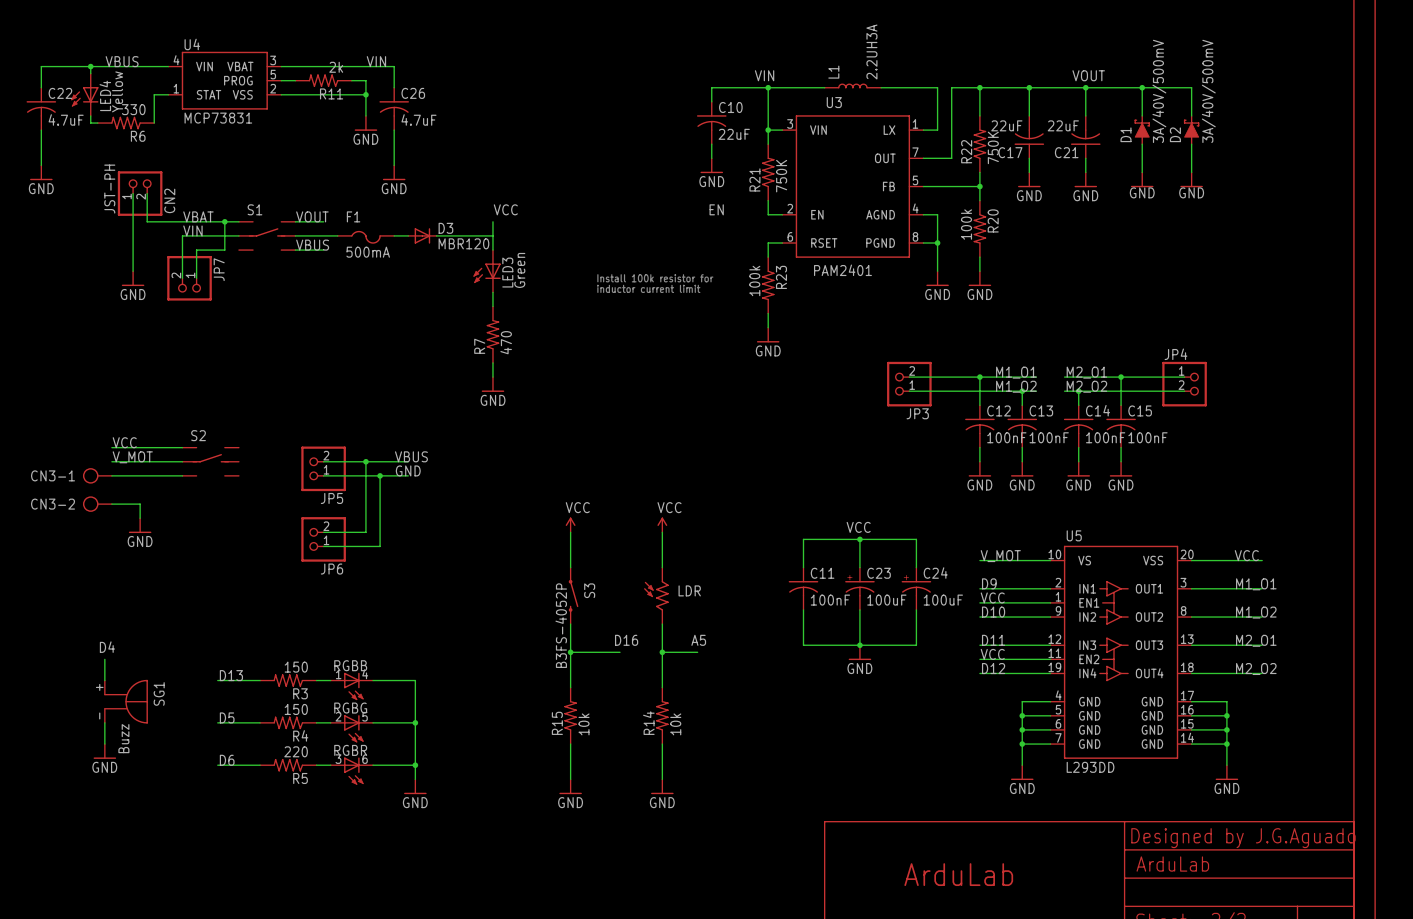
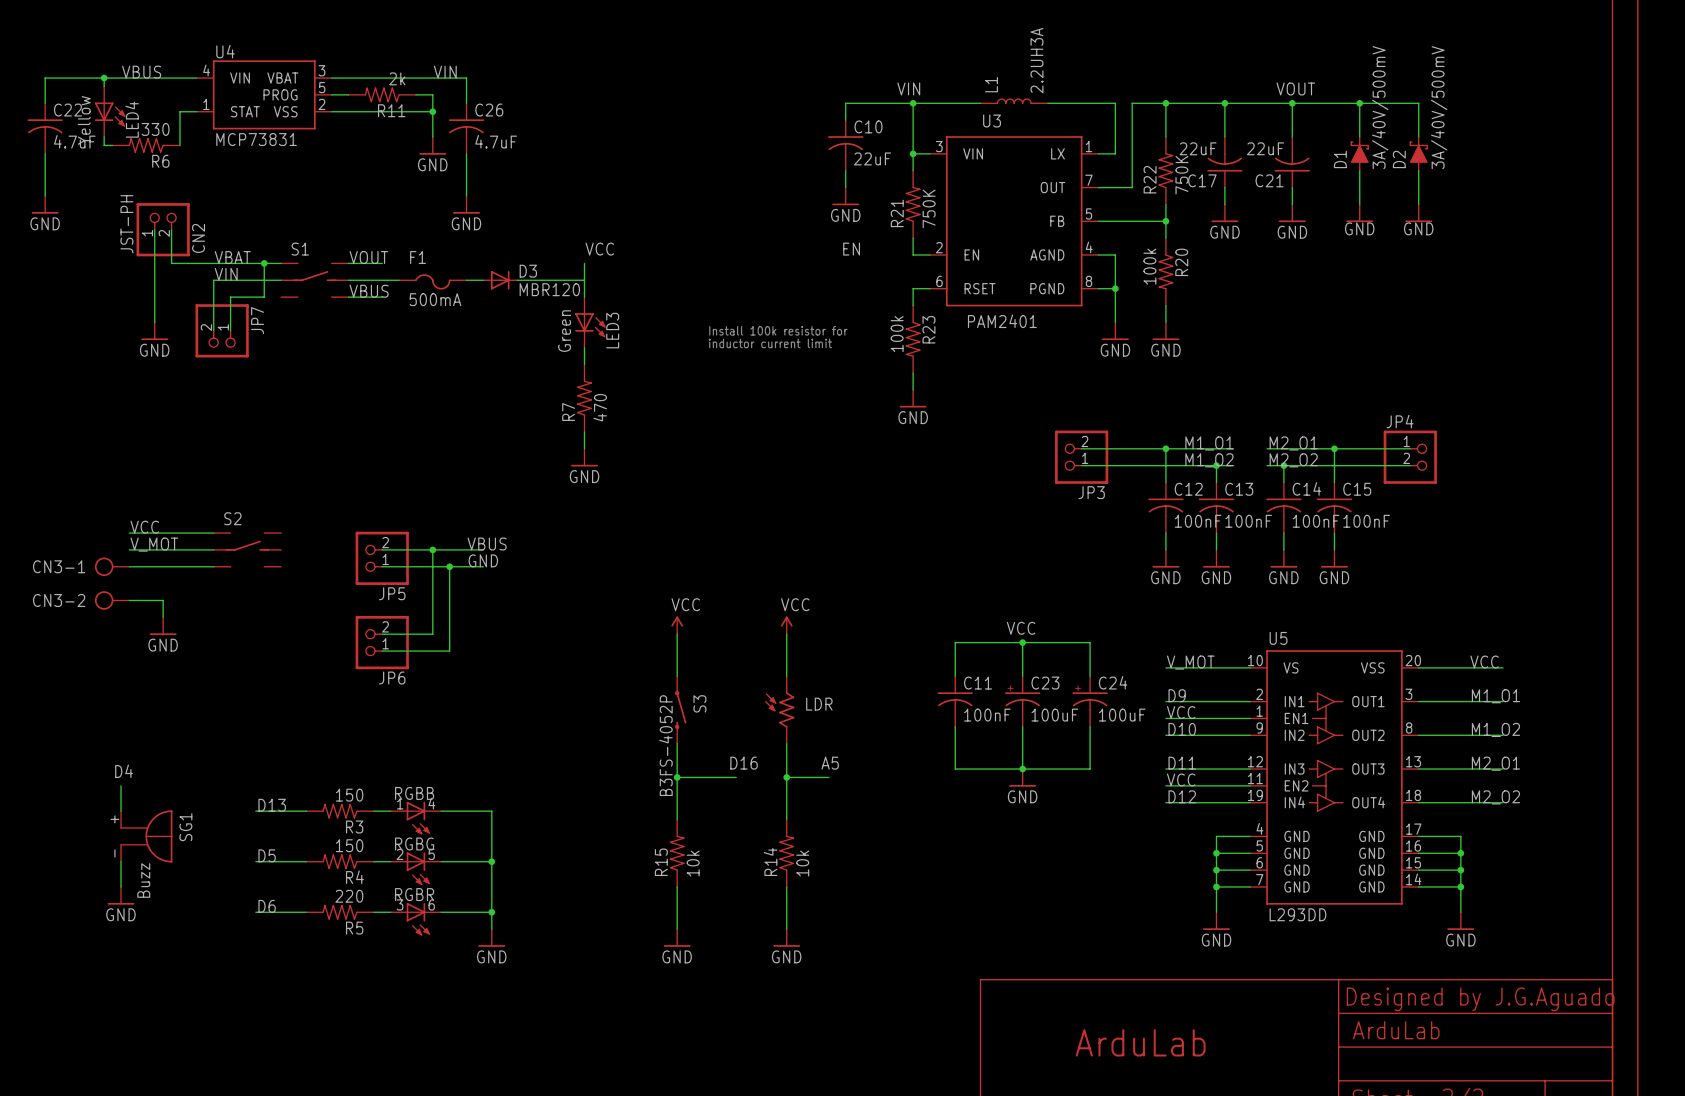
LED4 symbol: [71, 73, 99, 116] -> [94, 86, 126, 138]
LED4 value position: Yellow (117, 91) -> Yellow (84, 120)
LED3 symbol: [473, 250, 501, 293] -> [575, 297, 606, 348]
LED3 value position: Green (519, 270) -> Green (564, 331)

